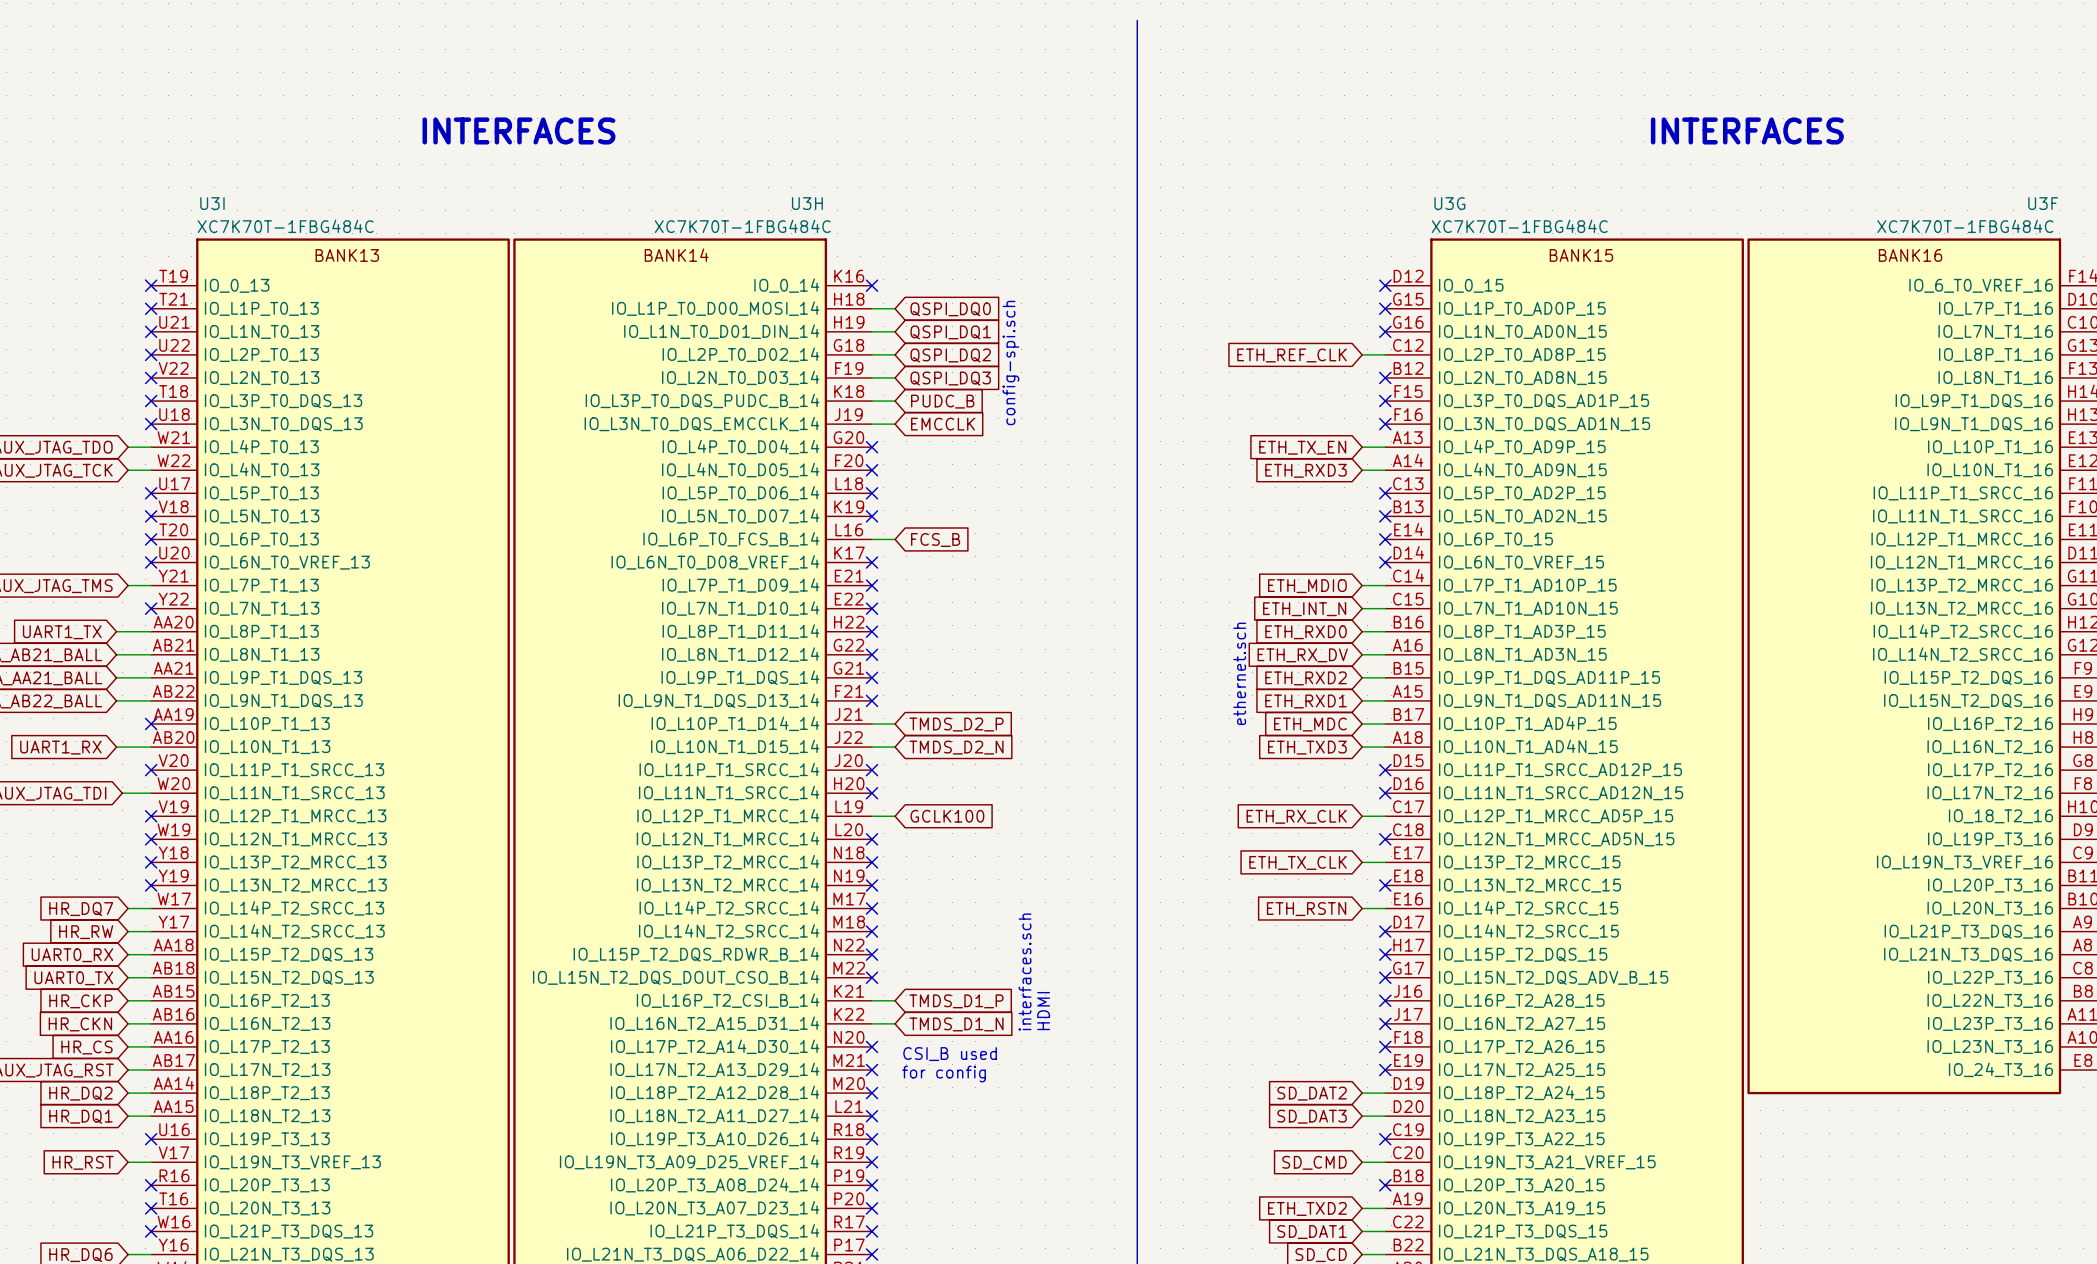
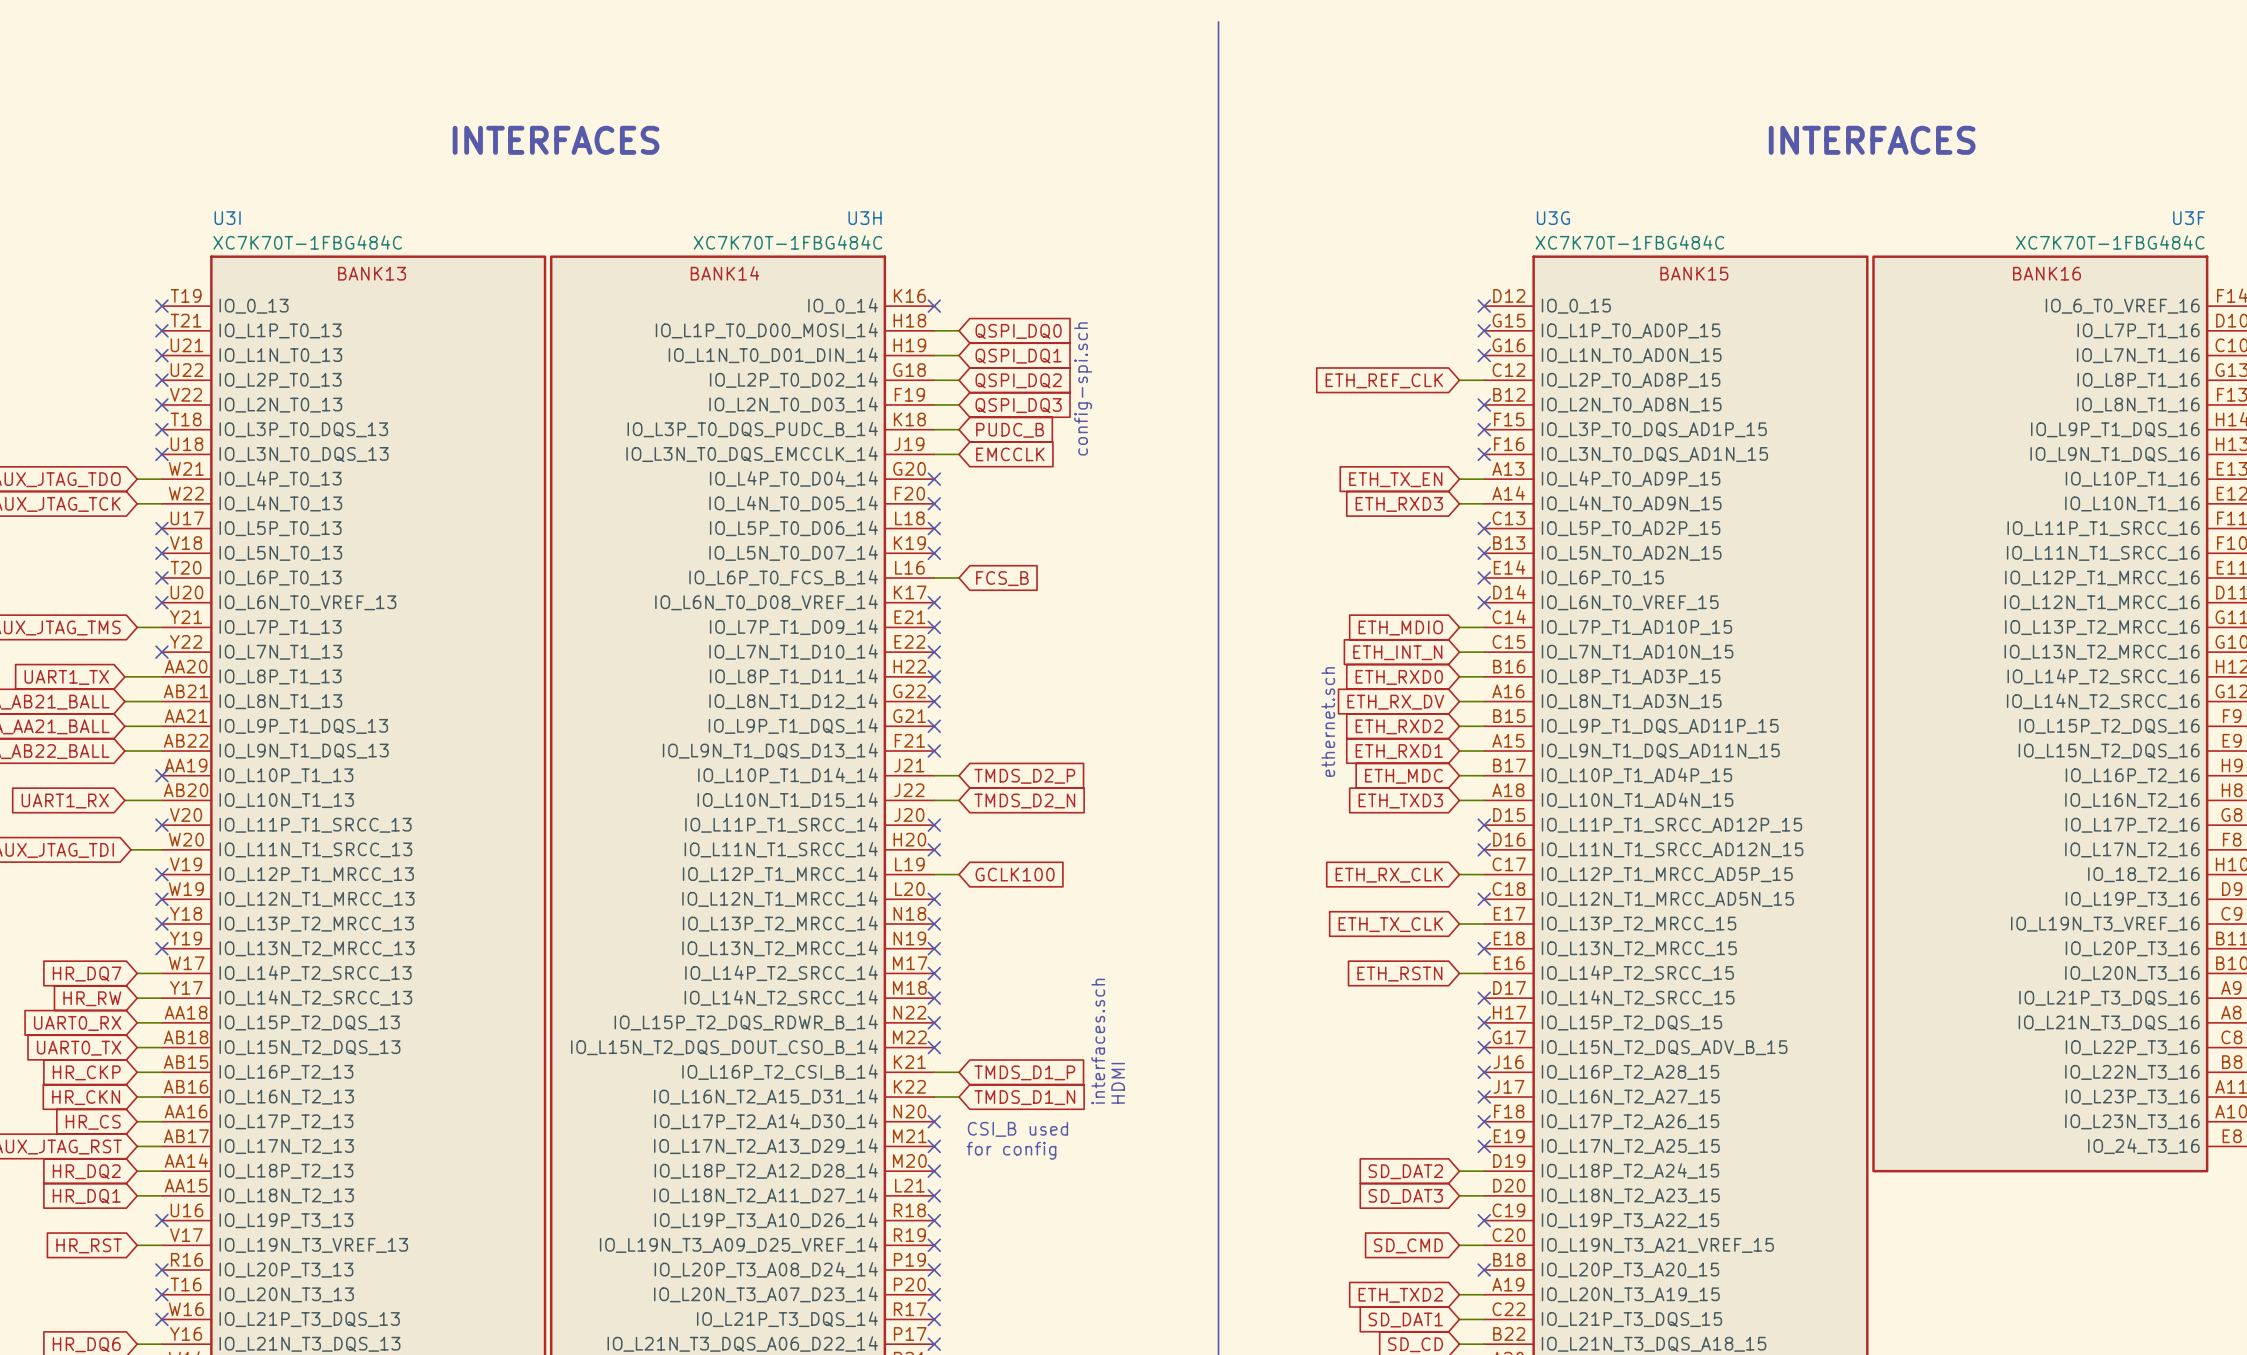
U3H text position: XC7K70T-1FBG484C (285, 226) -> XC7K70T-1FBG484C (787, 242)
U3I text position: XC7K70T-1FBG484C (742, 226) -> XC7K70T-1FBG484C (307, 242)
U3F text position: XC7K70T-1FBG484C (1519, 226) -> XC7K70T-1FBG484C (2110, 242)
U3G text position: XC7K70T-1FBG484C (1965, 226) -> XC7K70T-1FBG484C (1629, 242)

